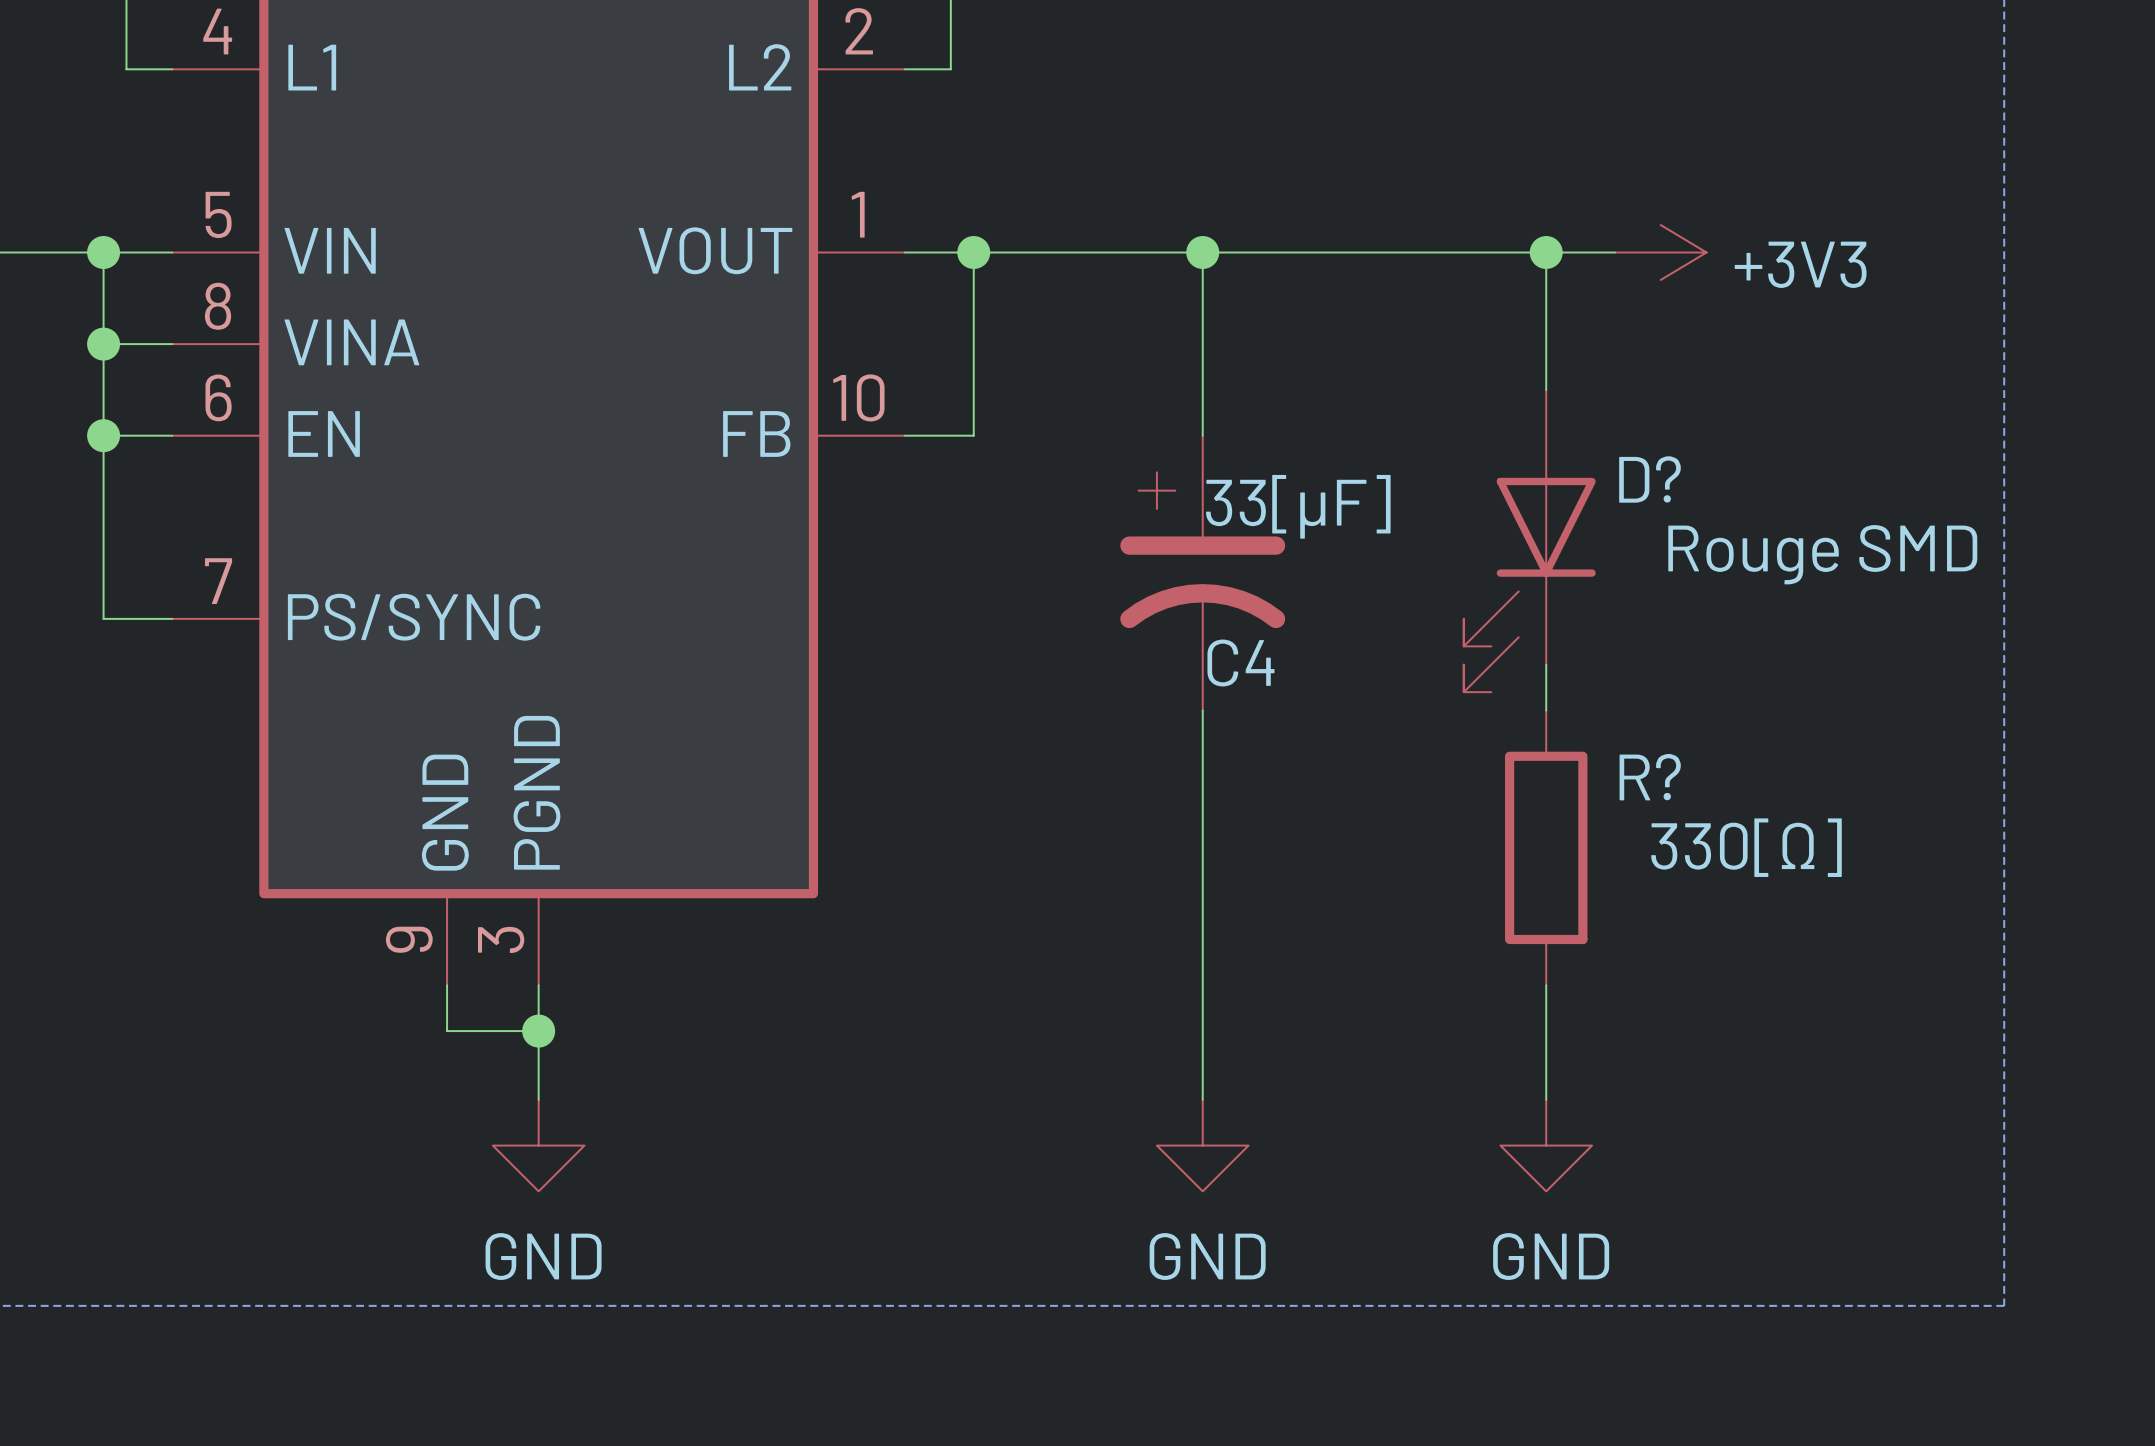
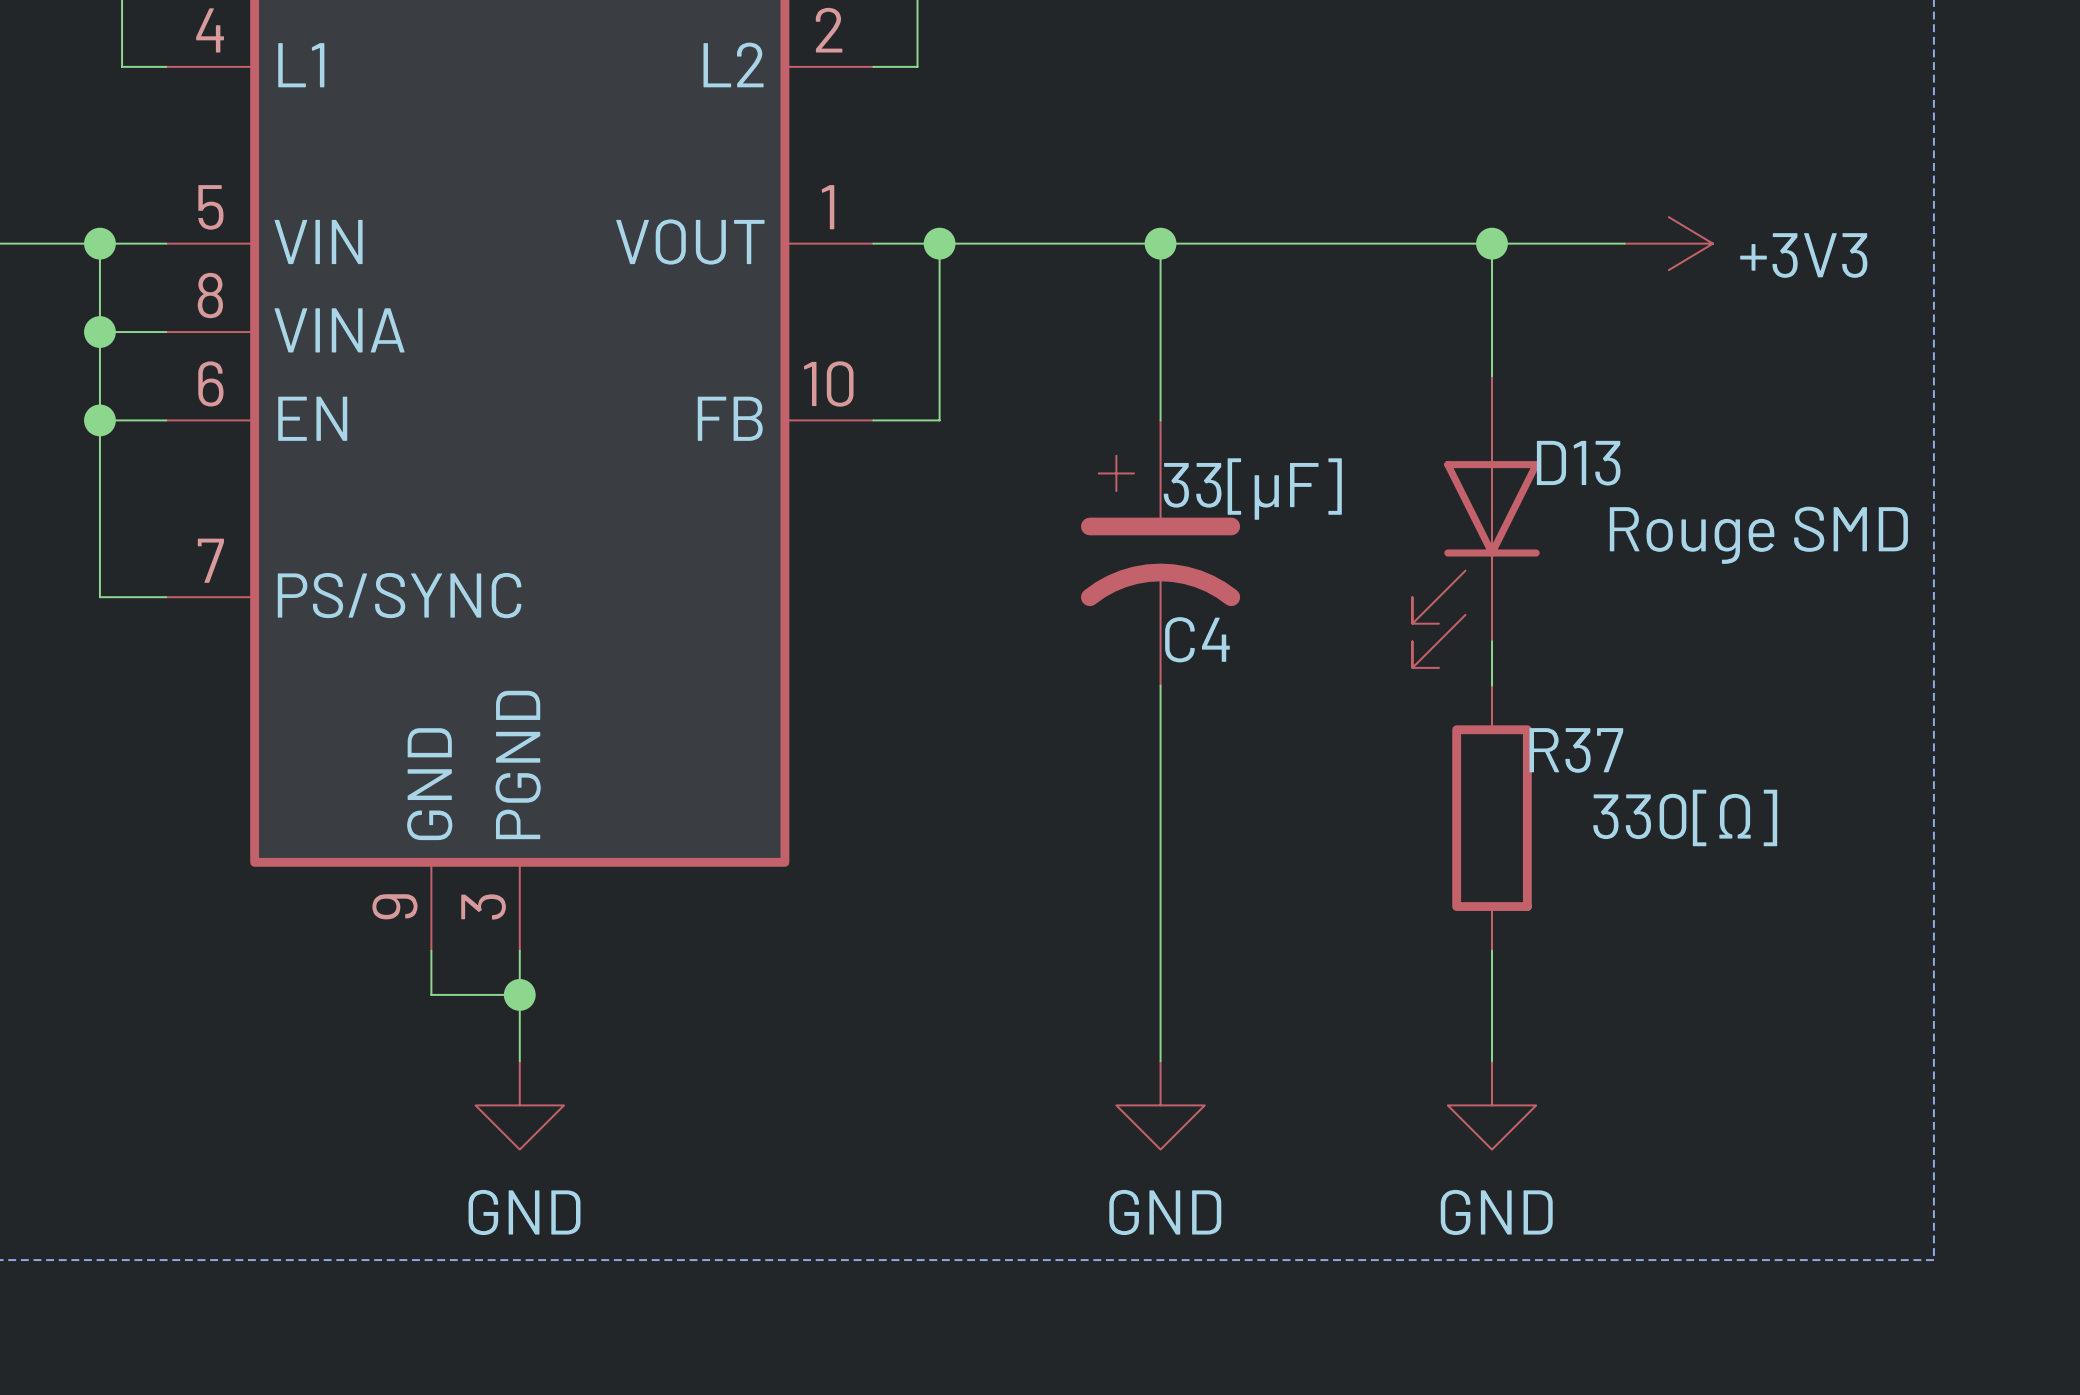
power symbol position: +3V3 (1660, 252) -> +3V3 (1668, 243)
D? name: D? (1649, 479) -> D13 (1578, 463)
R? name: R? (1650, 777) -> R37 (1576, 750)

